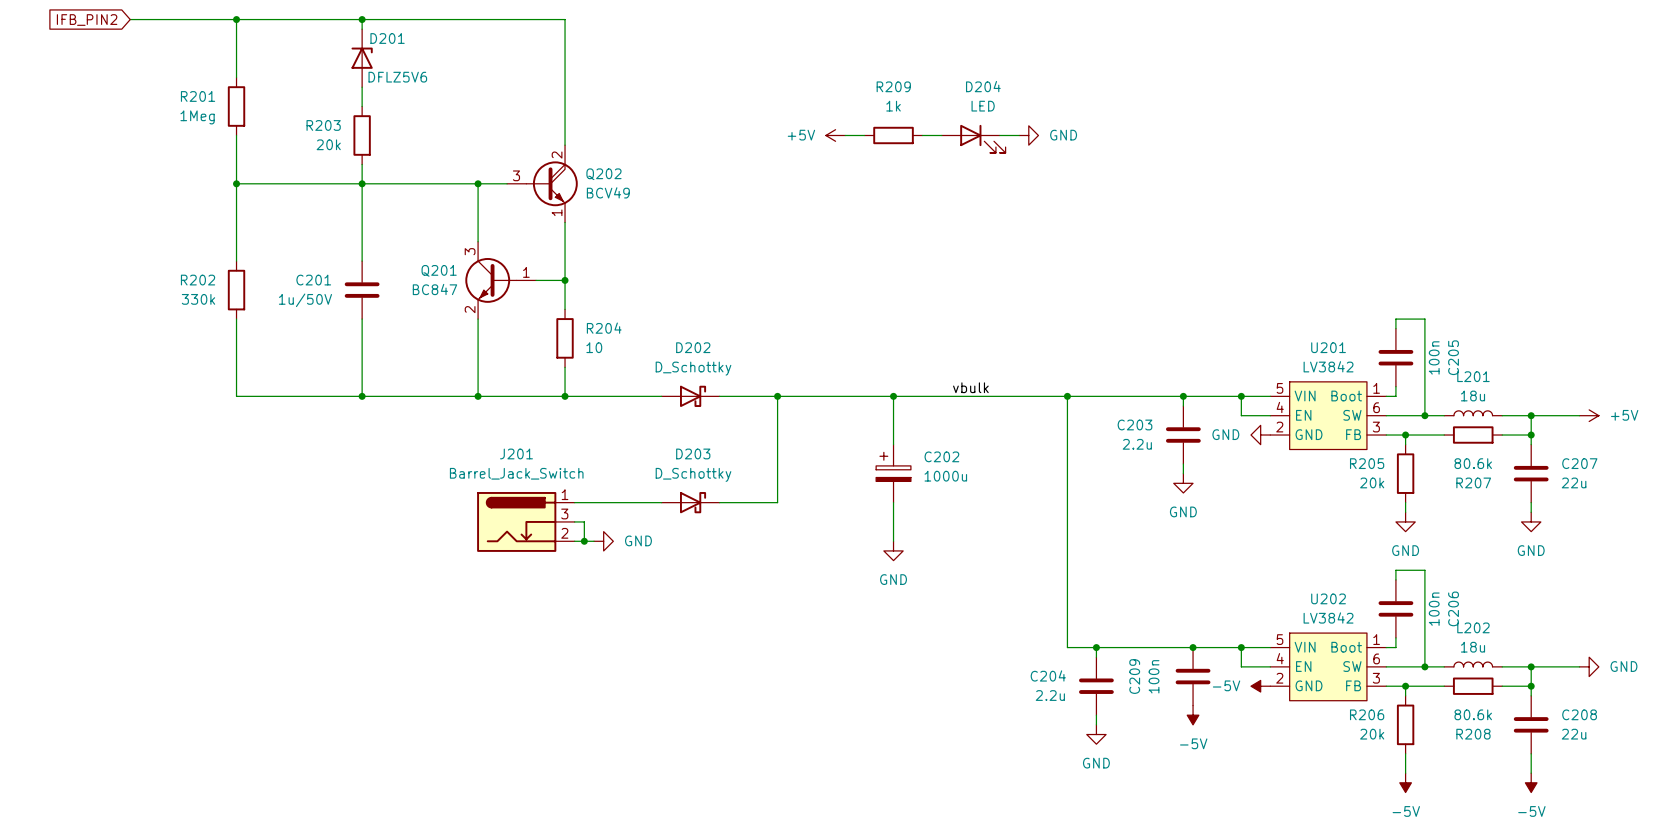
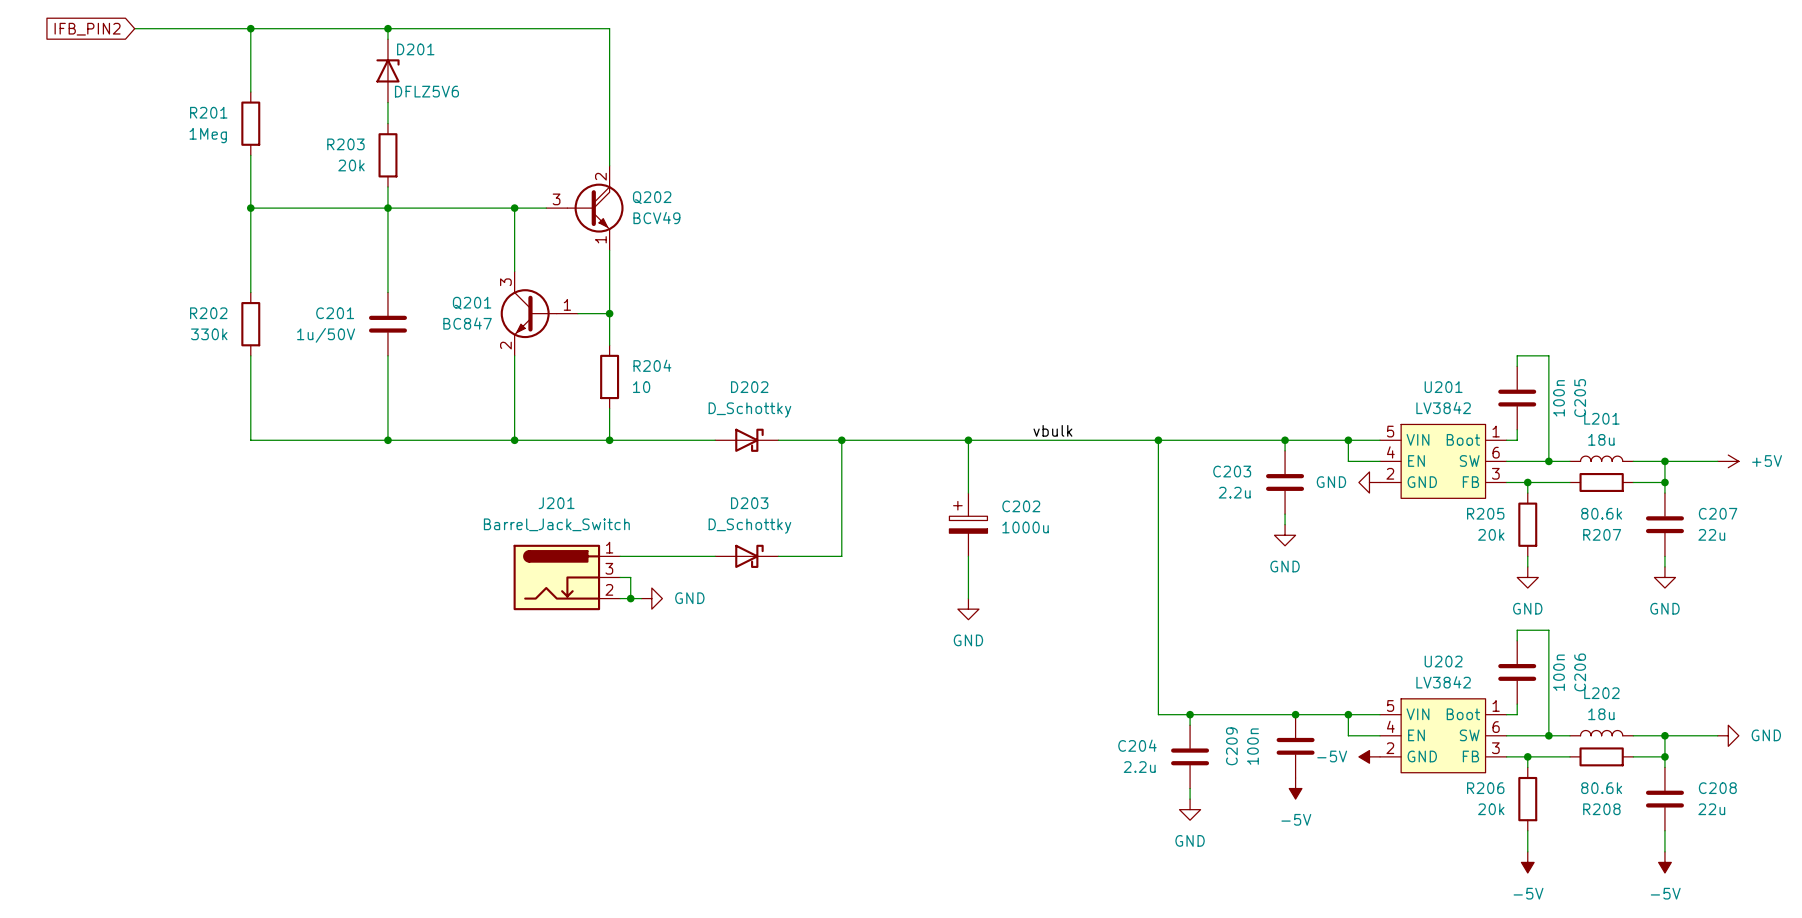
power symbol: +5V (835, 135) -> none
wire: (845, 135) (864, 135) -> none
R209: 1k (893, 135) -> none
wire: (922, 135) (941, 135) -> none
wire: (999, 135) (1019, 135) -> none
power symbol: GND (1028, 135) -> none
D204: LED (973, 138) -> none

